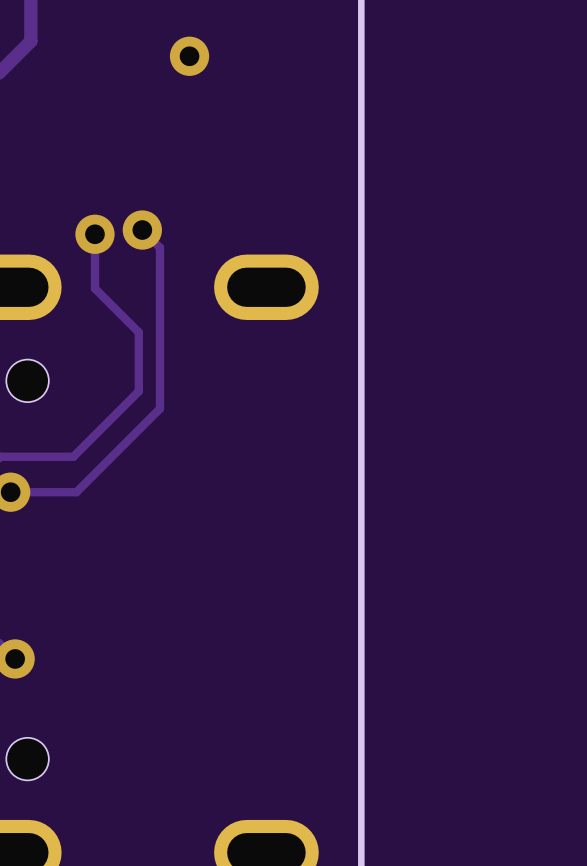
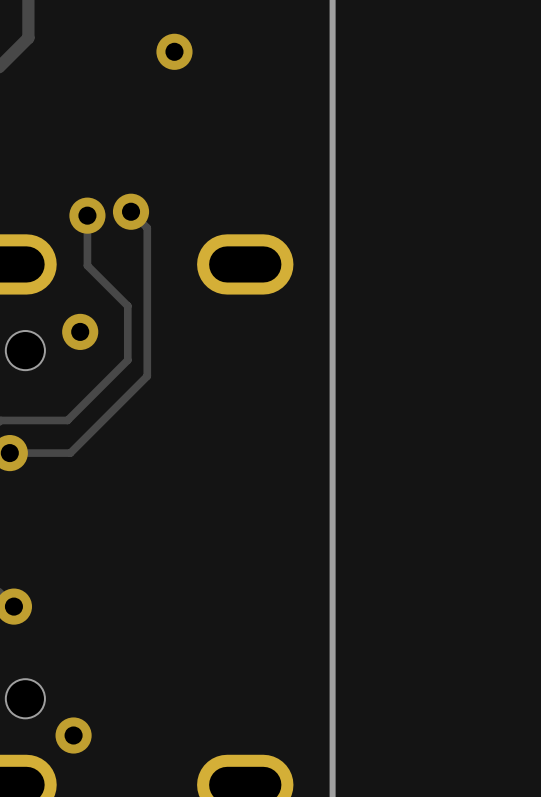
via: none -> (80, 331)
via: none -> (73, 735)

